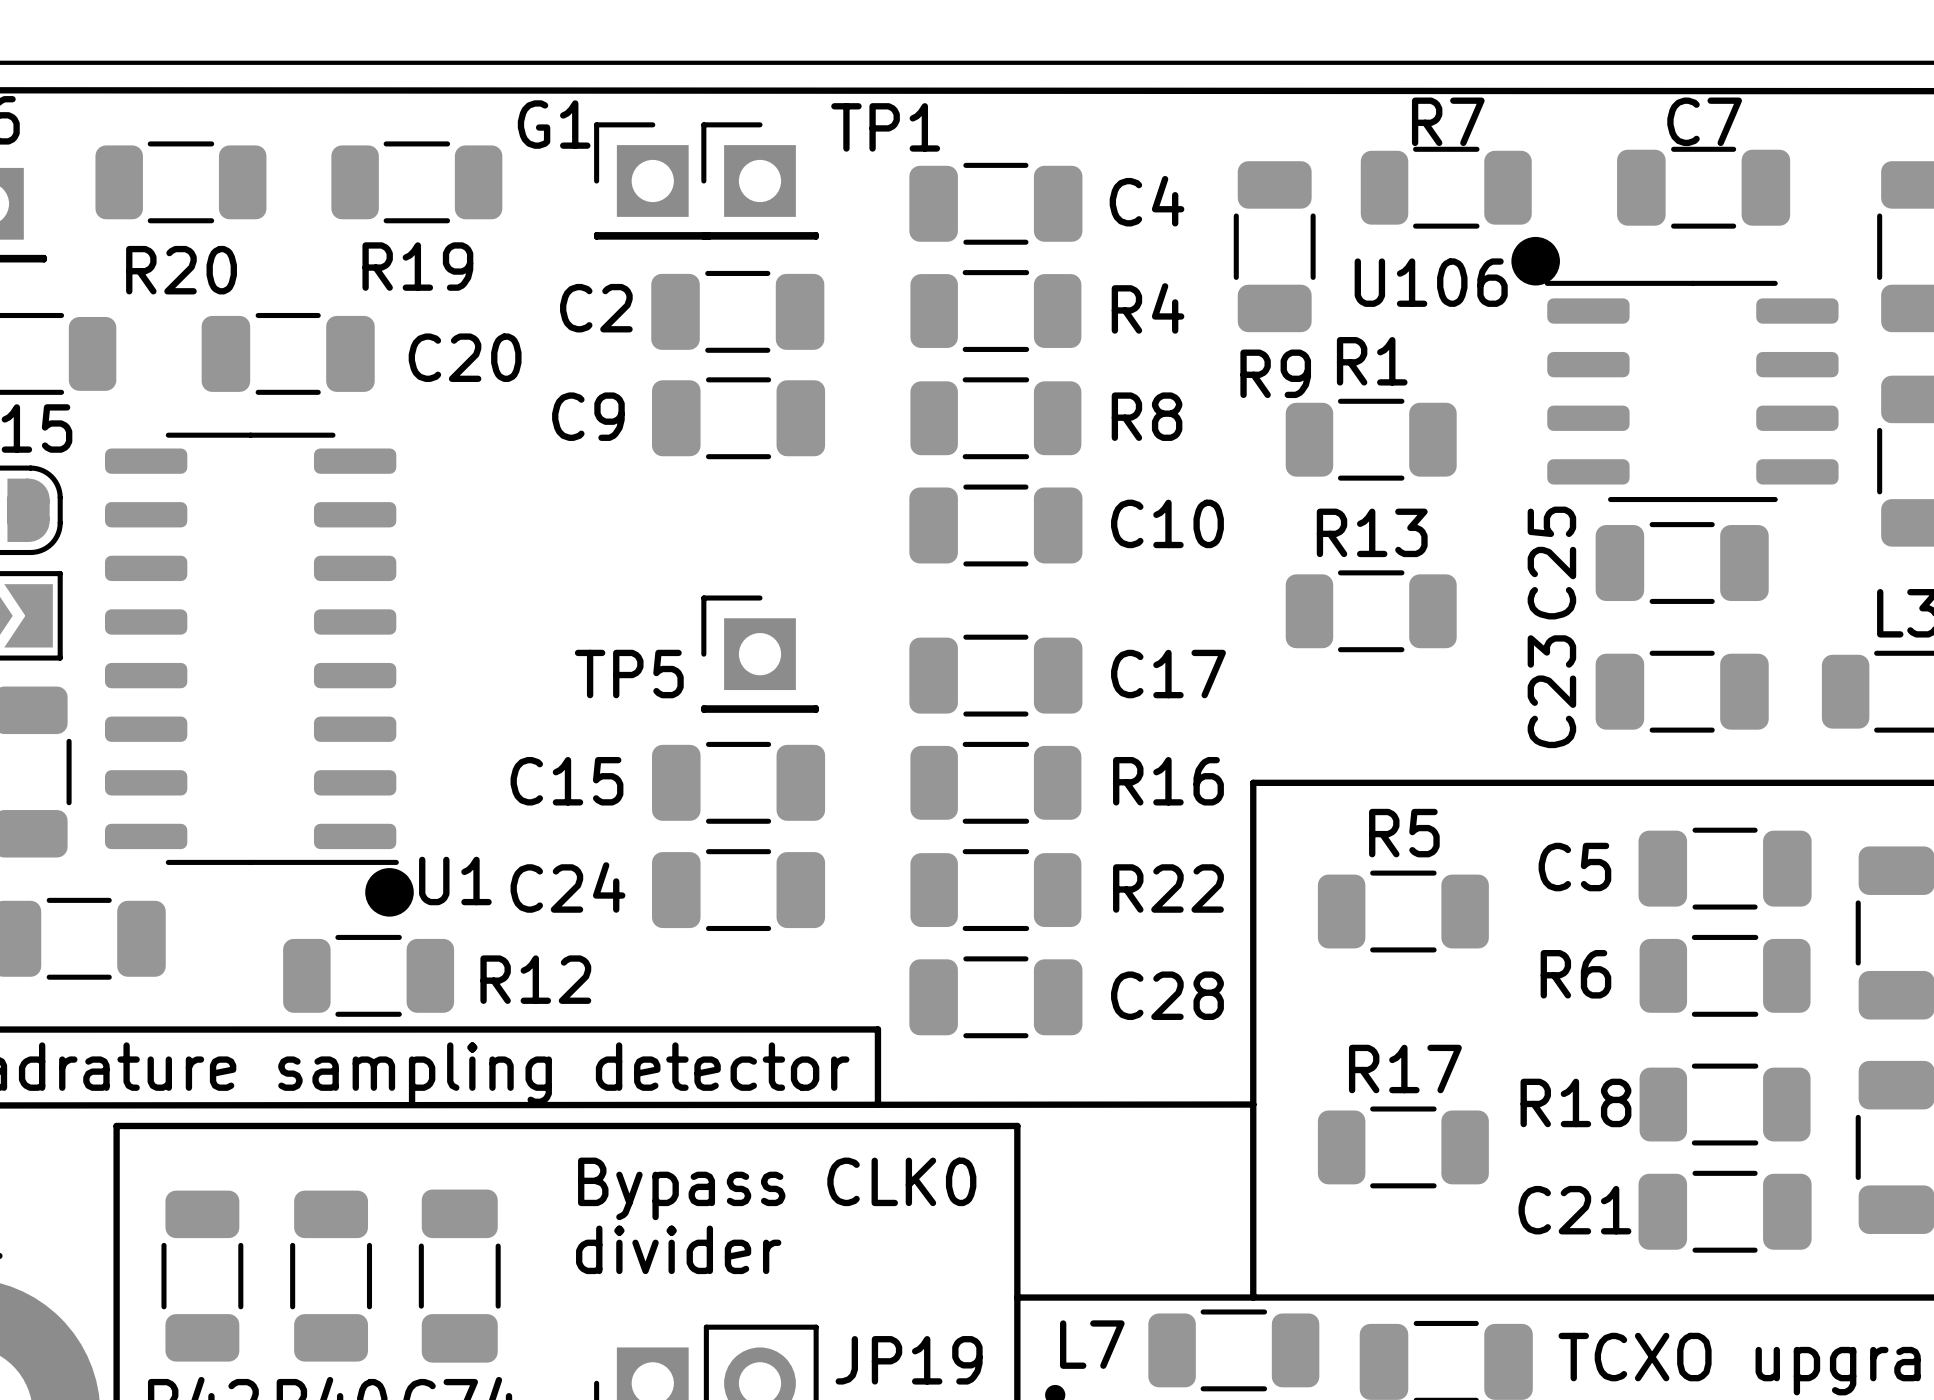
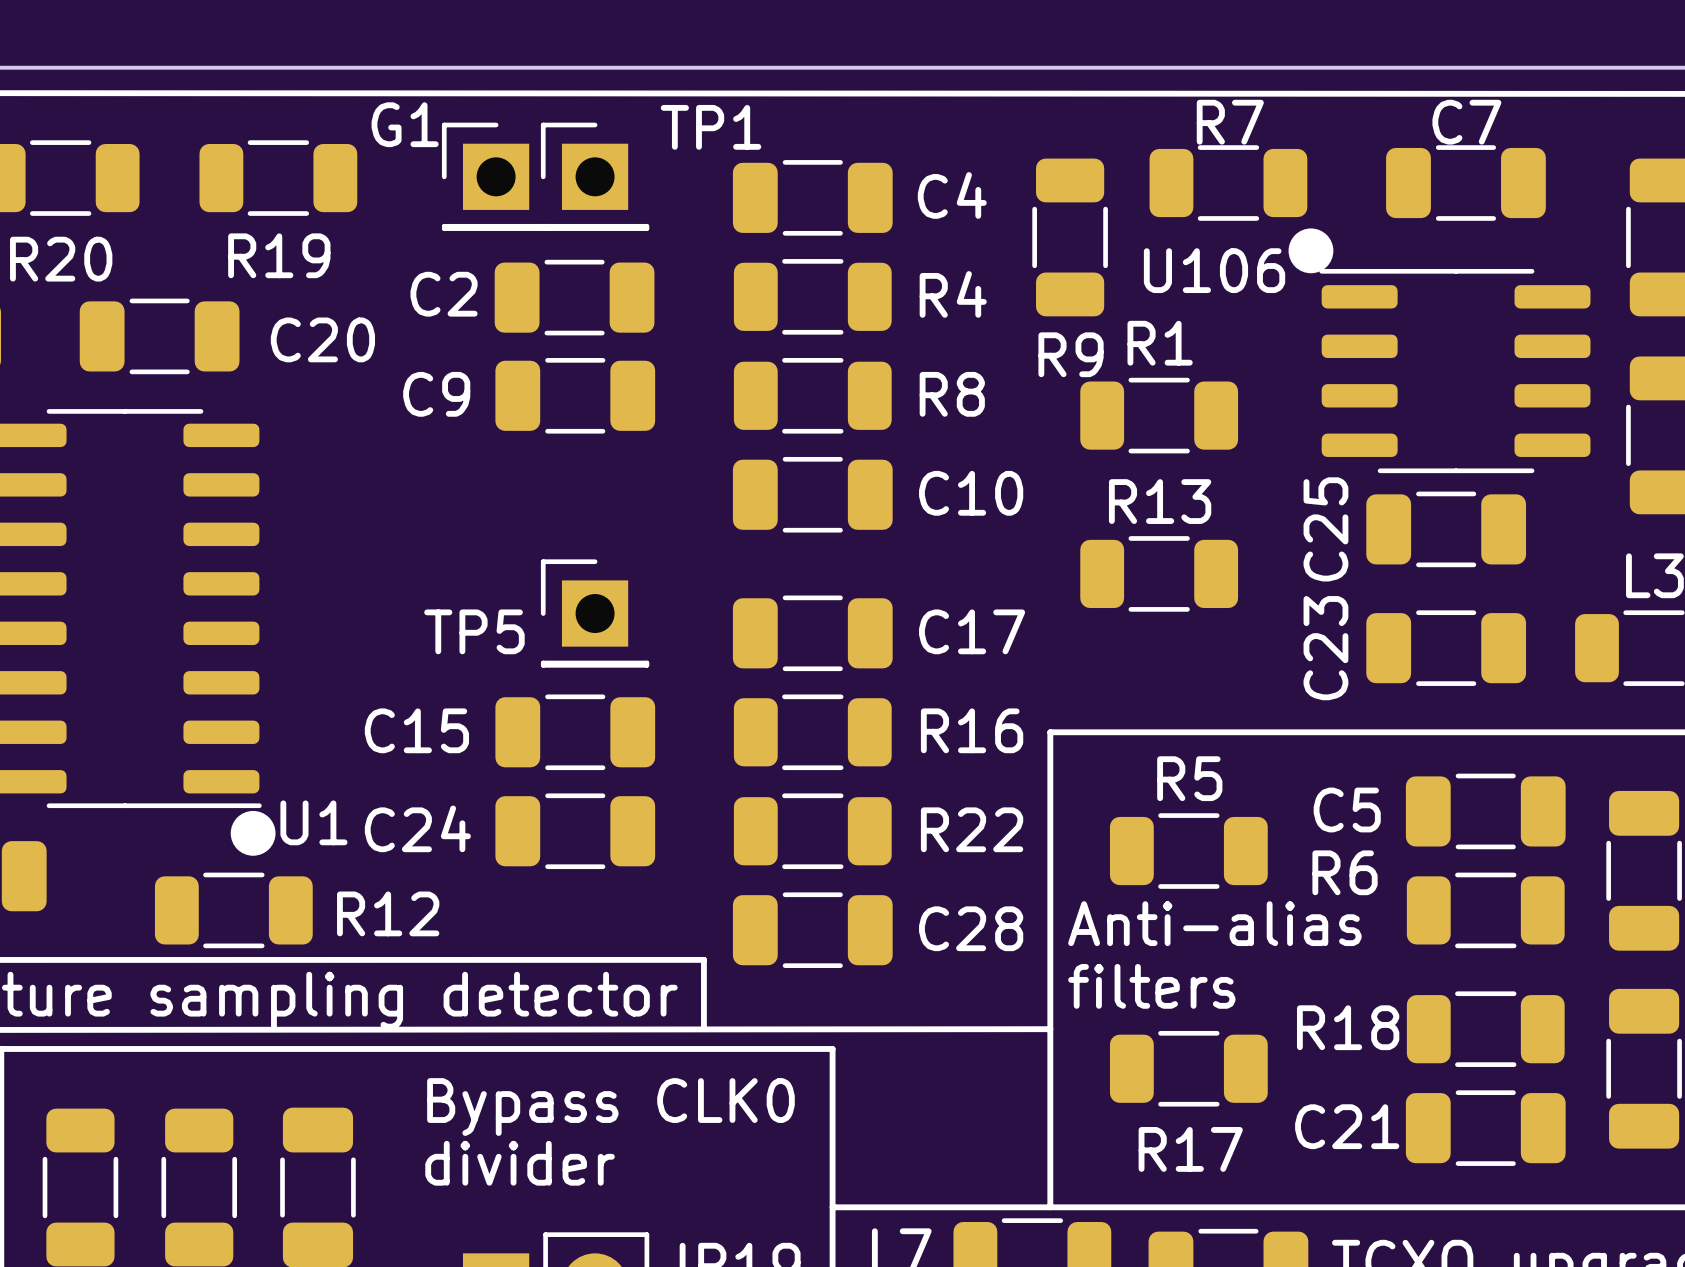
R6 name position: R6 (1575, 974) -> R6 (1345, 872)
text: none -> Anti-alias (1214, 923)
text: none -> filters (1151, 986)
R17 name position: R17 (1405, 1069) -> R17 (1190, 1149)

